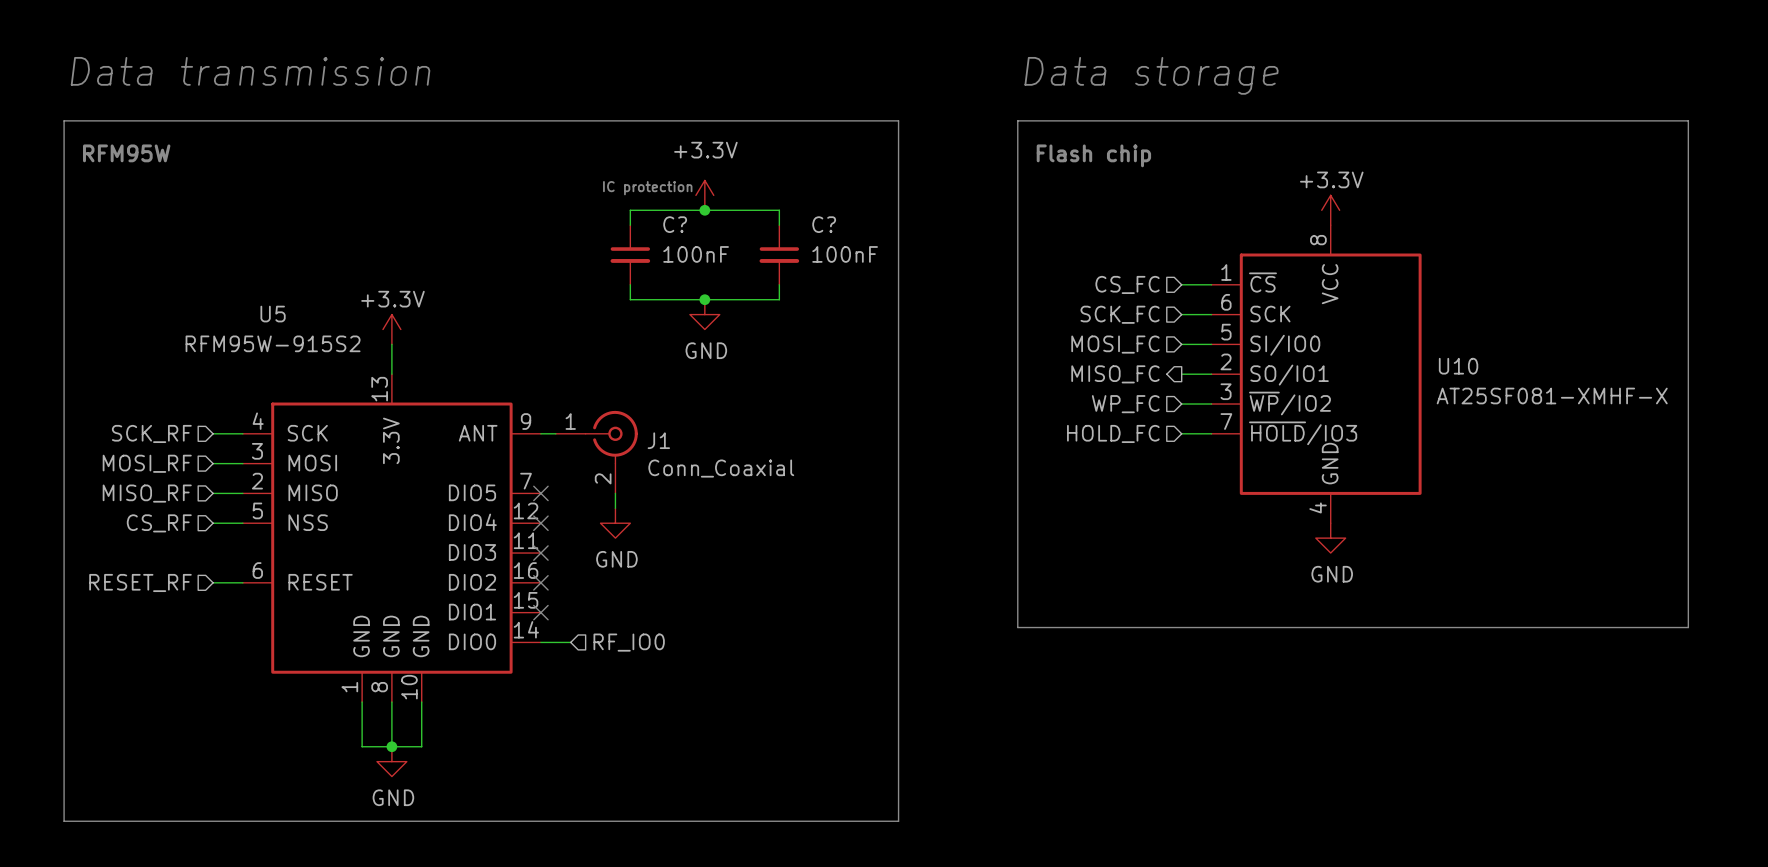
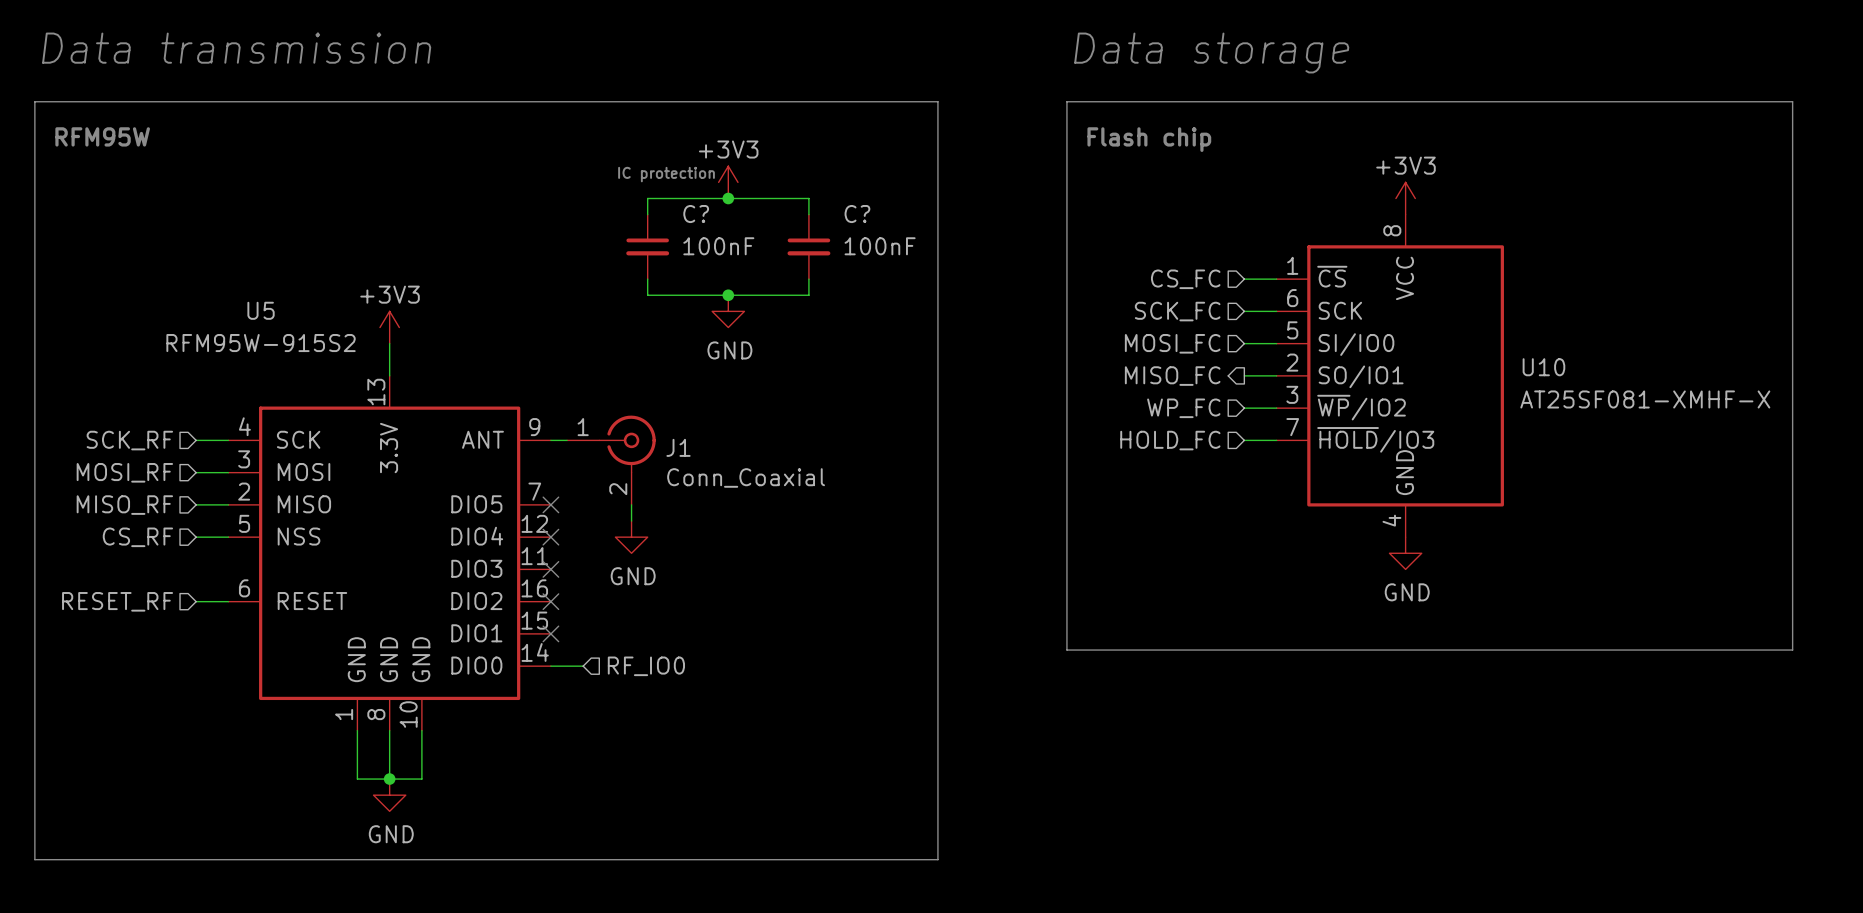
power symbol: +3.3V (704, 195) -> +3V3 (728, 182)
power symbol: +3.3V (1330, 210) -> +3V3 (1405, 198)
power symbol: +3.3V (391, 329) -> +3V3 (389, 327)

